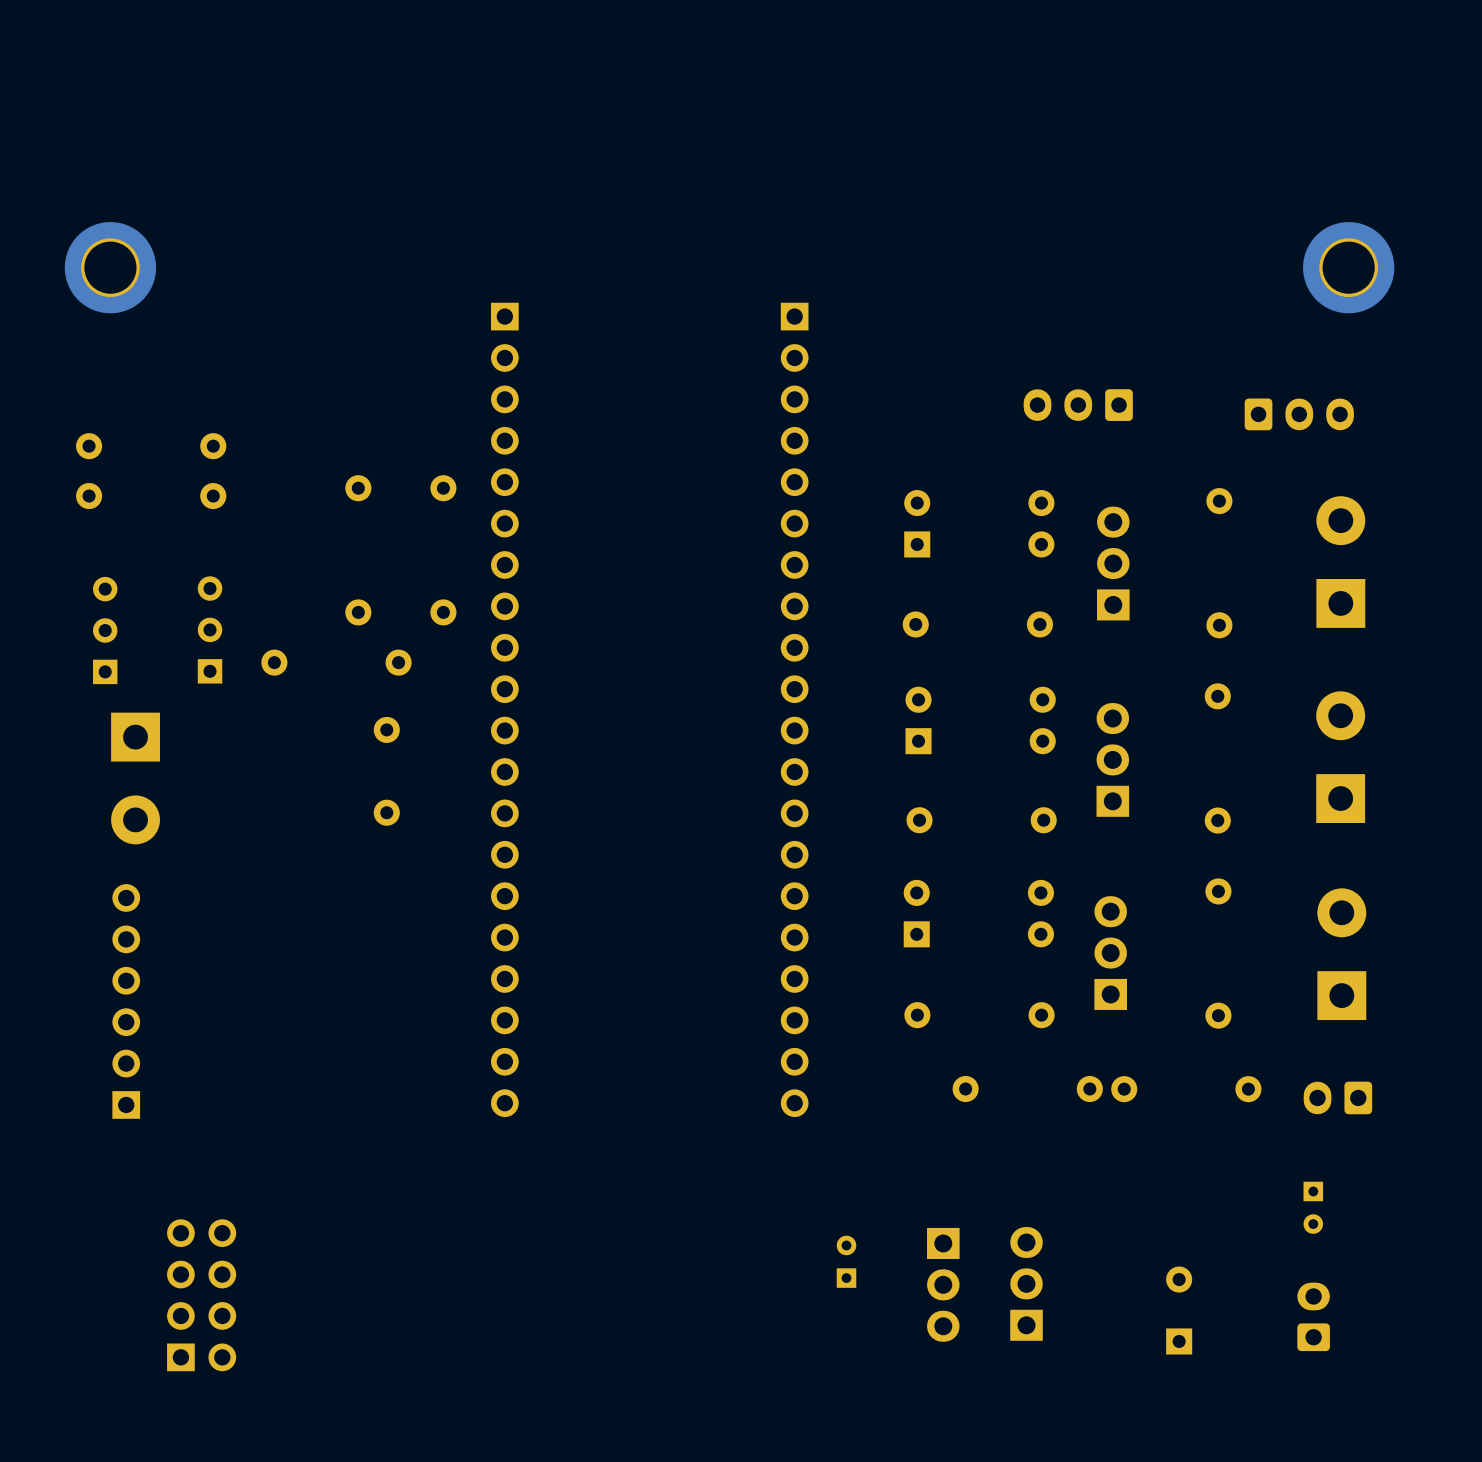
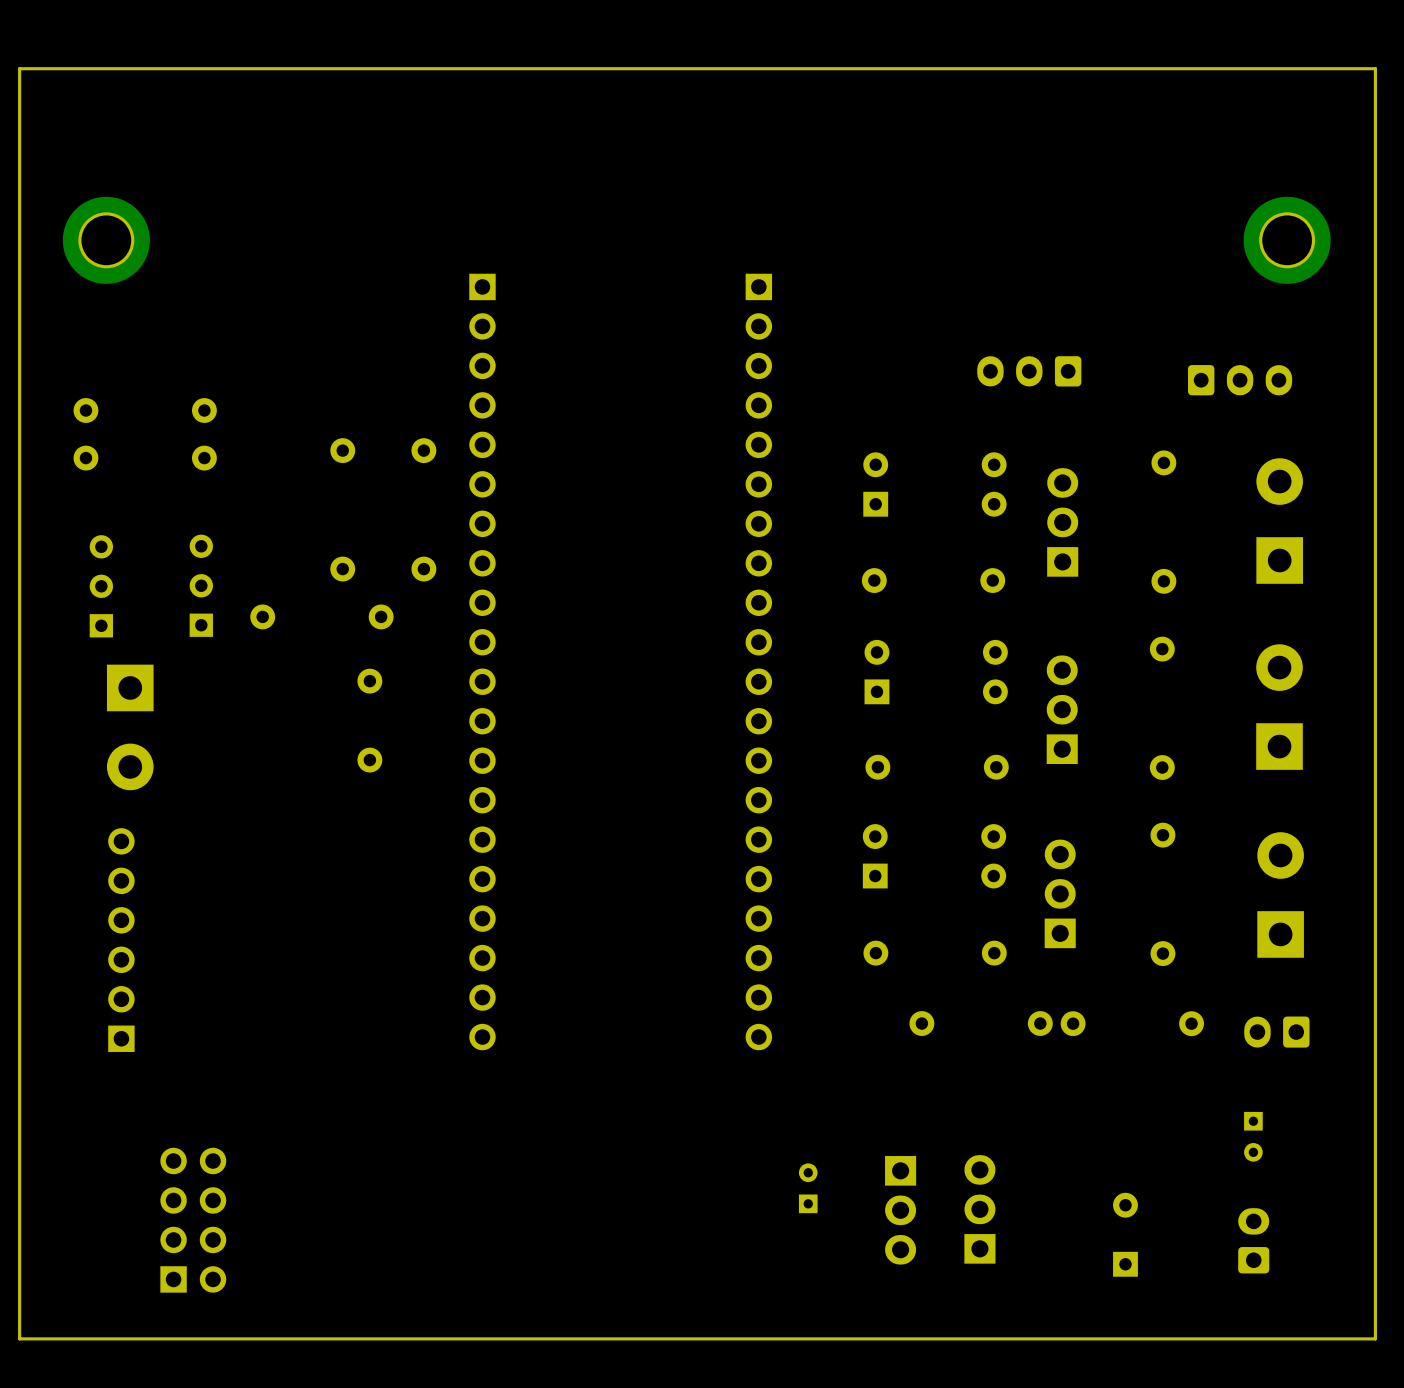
board edge: none -> (1375, 68) (19, 68) (19, 1338) (1375, 1338) (1375, 68)

